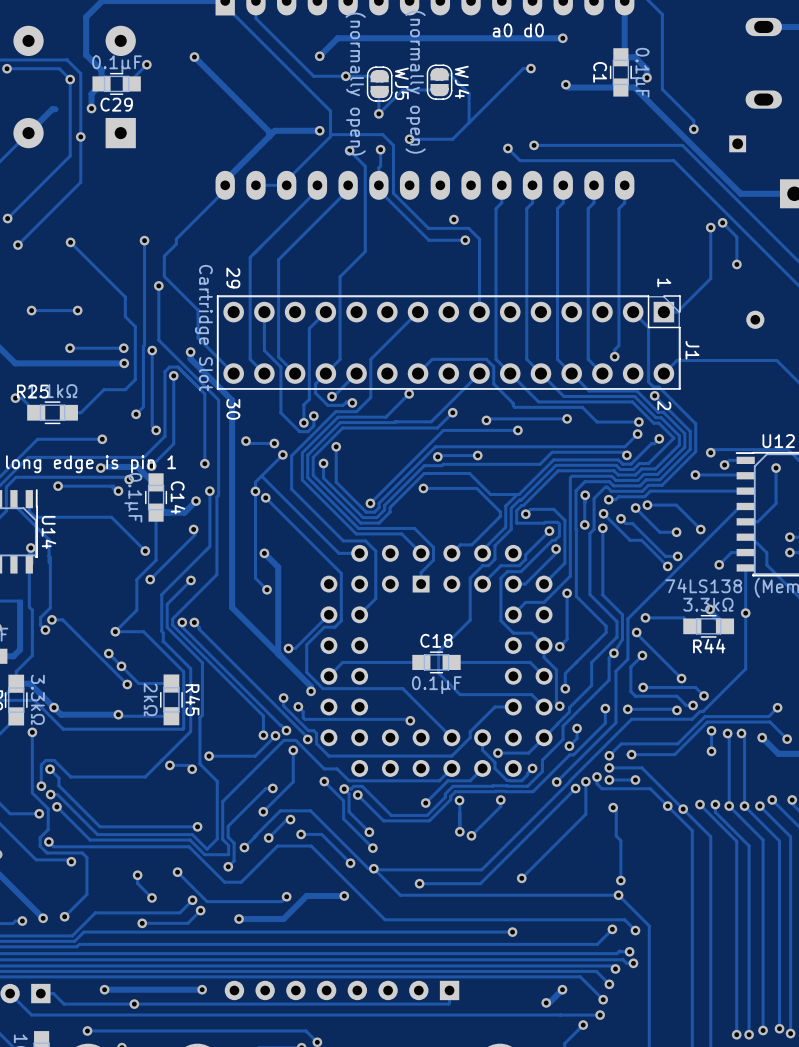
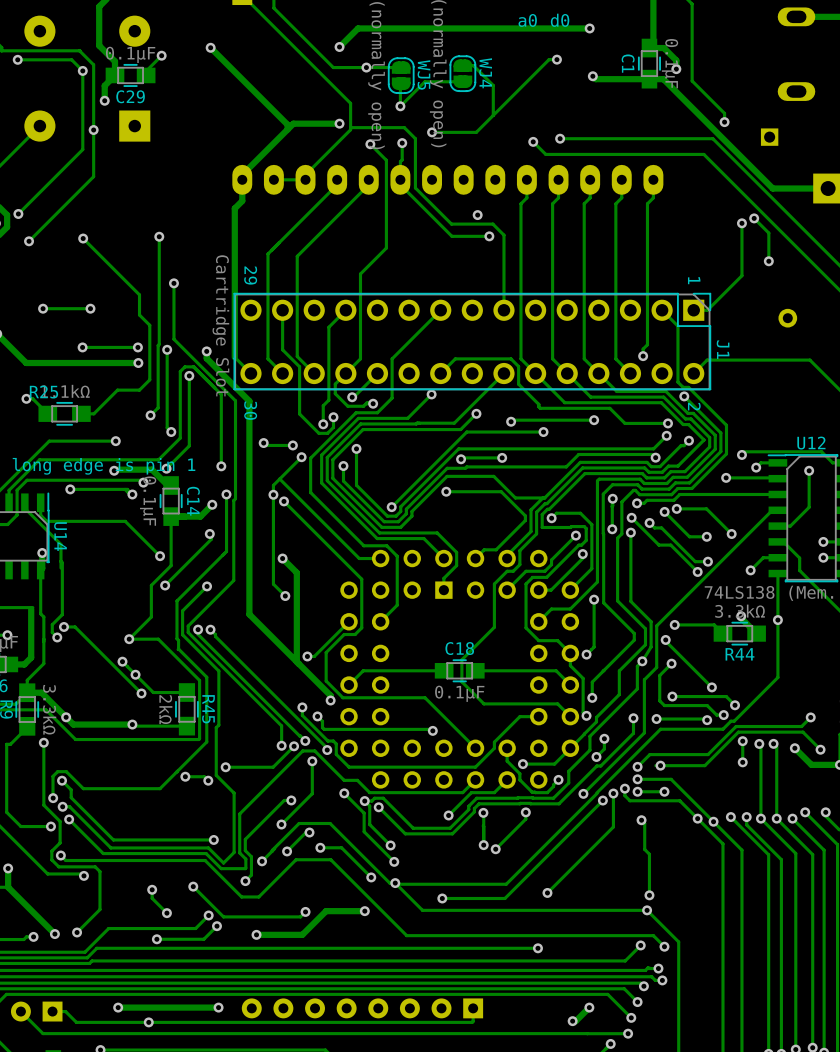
track: (55, 109) (52, 109) (28, 133) -> none
track: (225, 190) (176, 239) (176, 244) (164, 256) (164, 276) (198, 310) -> none
track: (198, 310) (198, 337) (217, 357) -> (242, 179) (242, 200) (234, 208) (234, 357)

